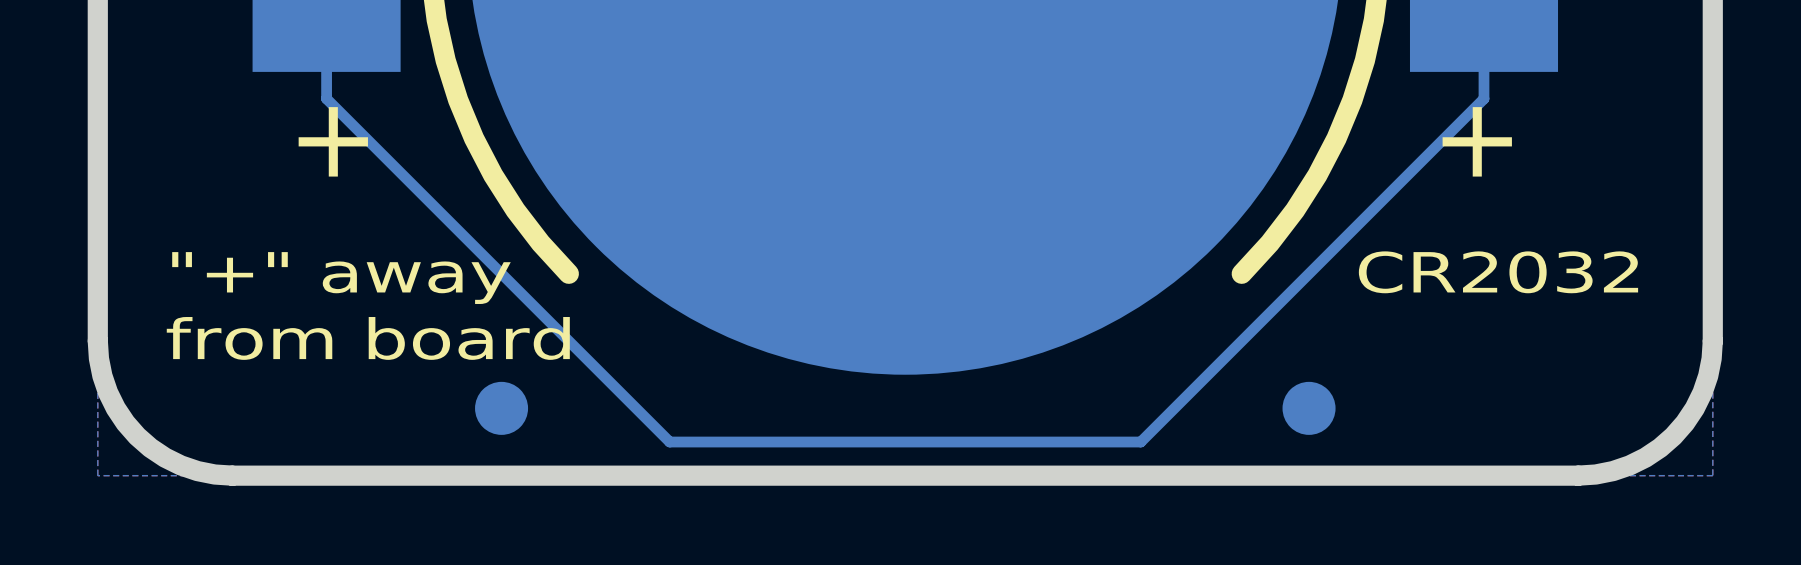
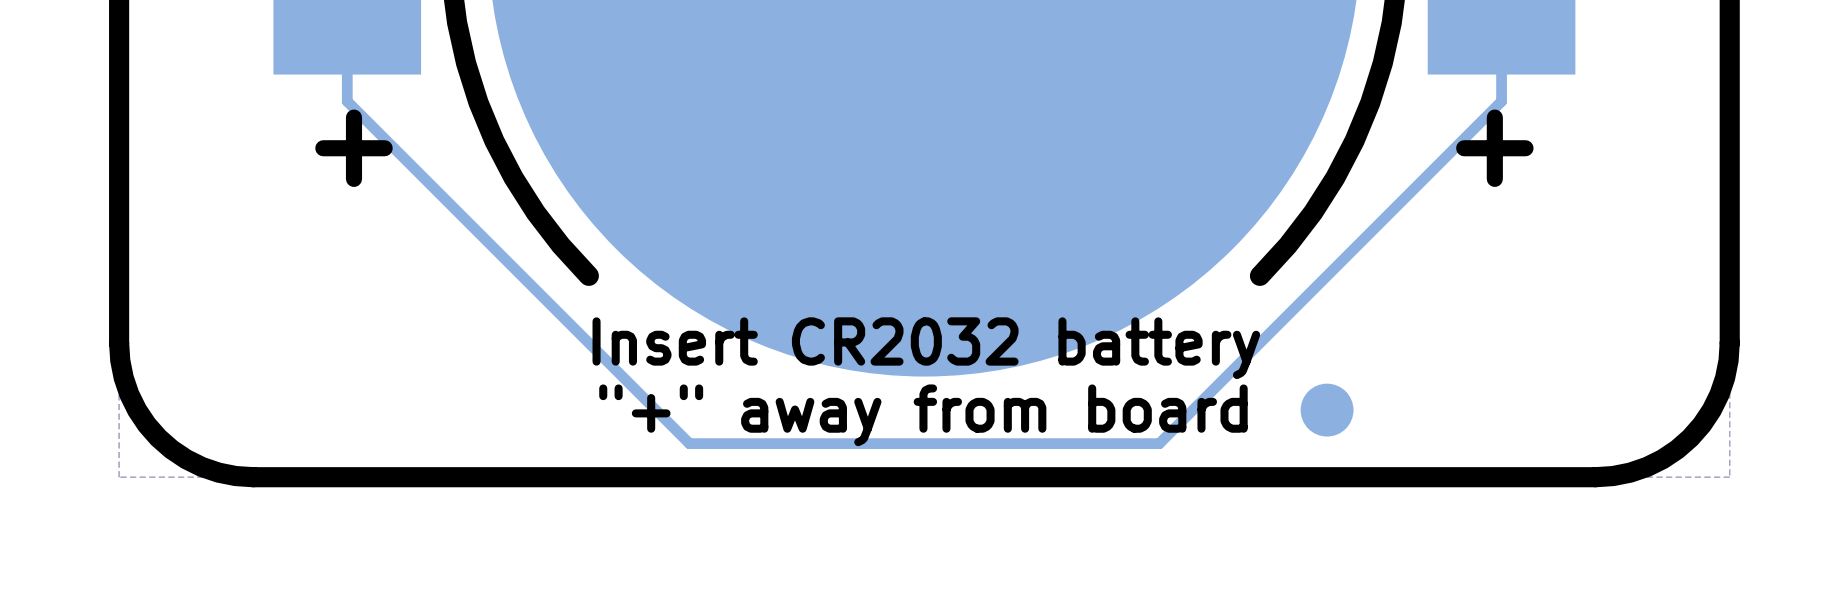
text: CR2032 (1498, 272) -> none
text: "+" away (341, 278) -> none
text: from board (368, 338) -> none
part text: none -> Insert CR2032 battery (926, 348)
part: (501, 408) -> none
part text: none -> "+" away from board (923, 415)

